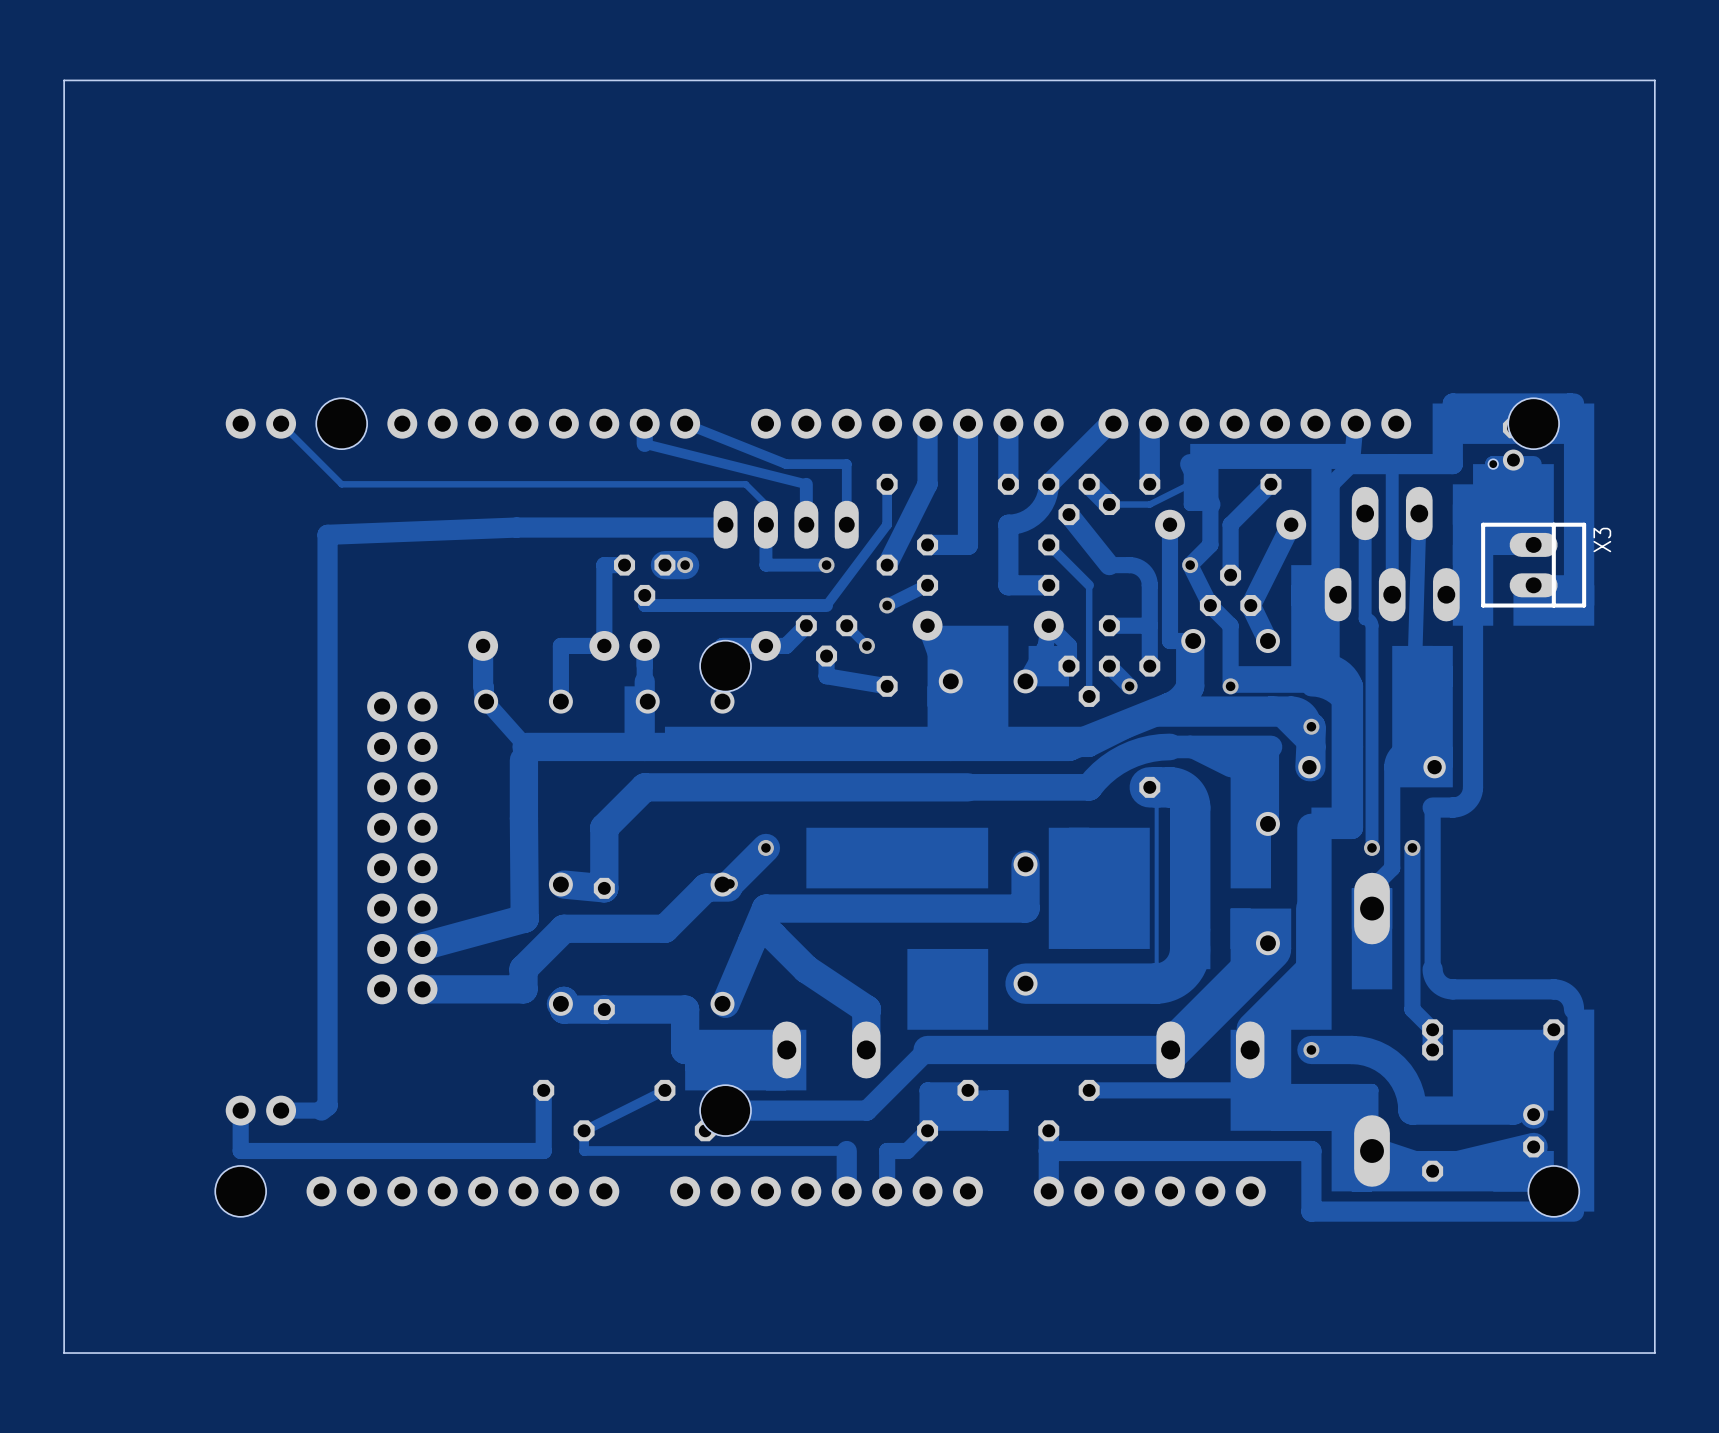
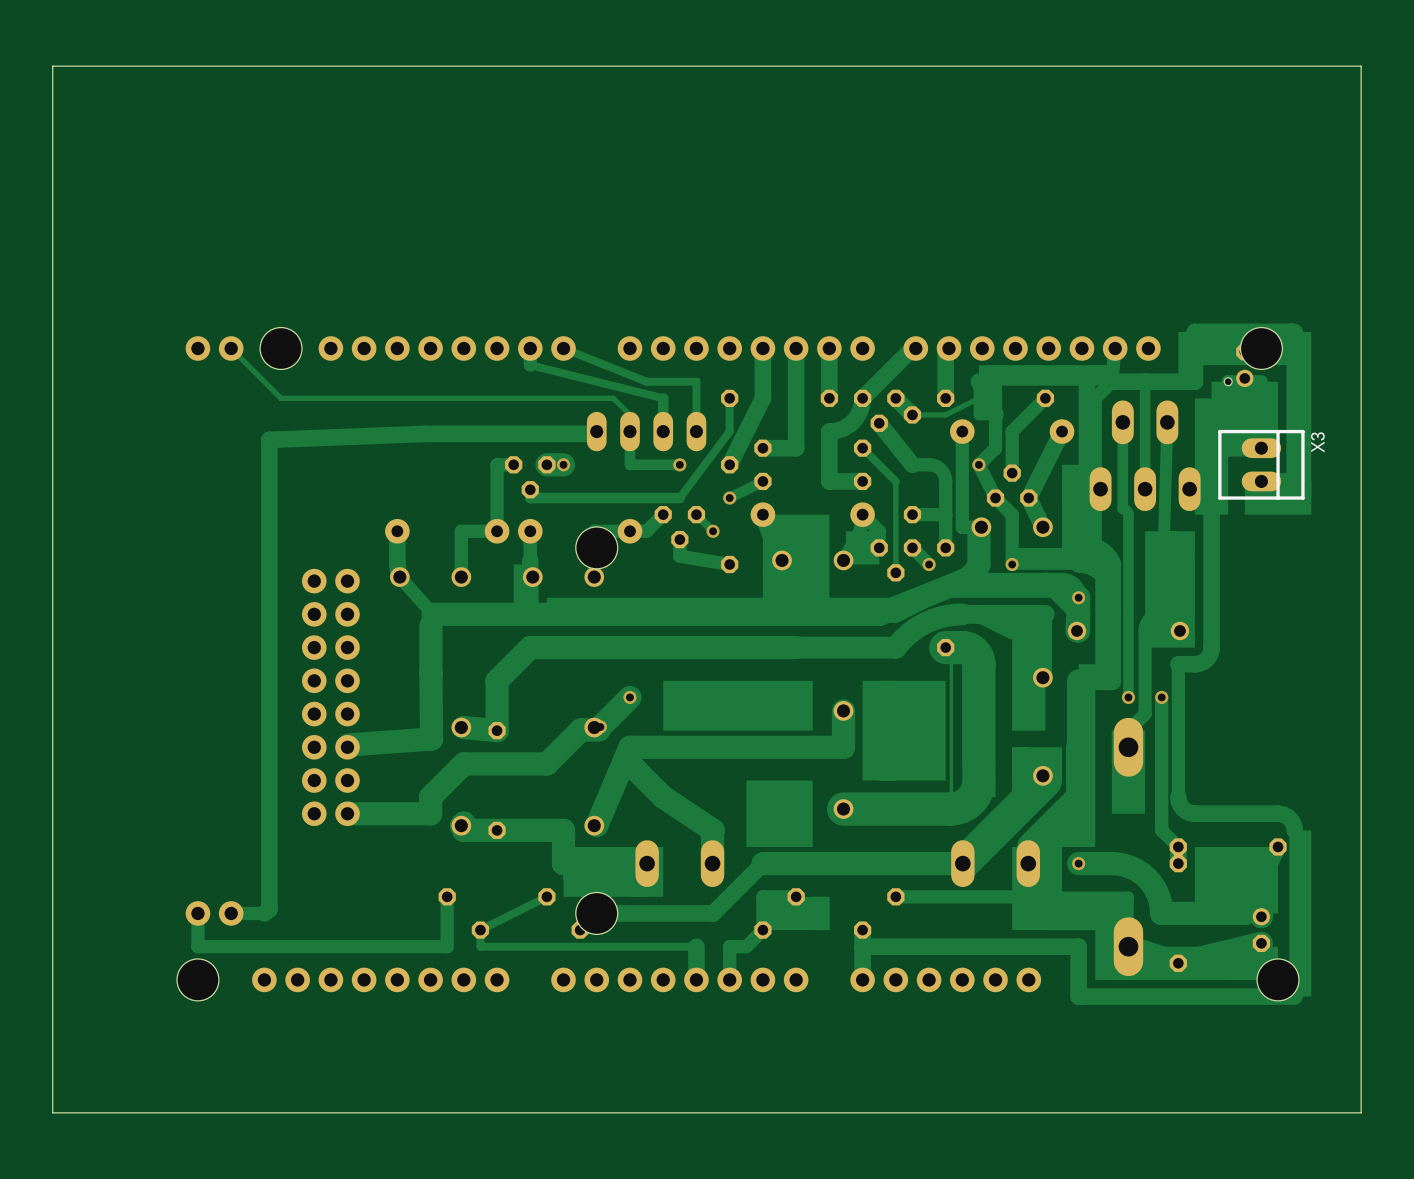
track: (523, 818) (524, 918) (423, 946) -> (430, 673) (431, 738) (348, 744) (347, 747)

